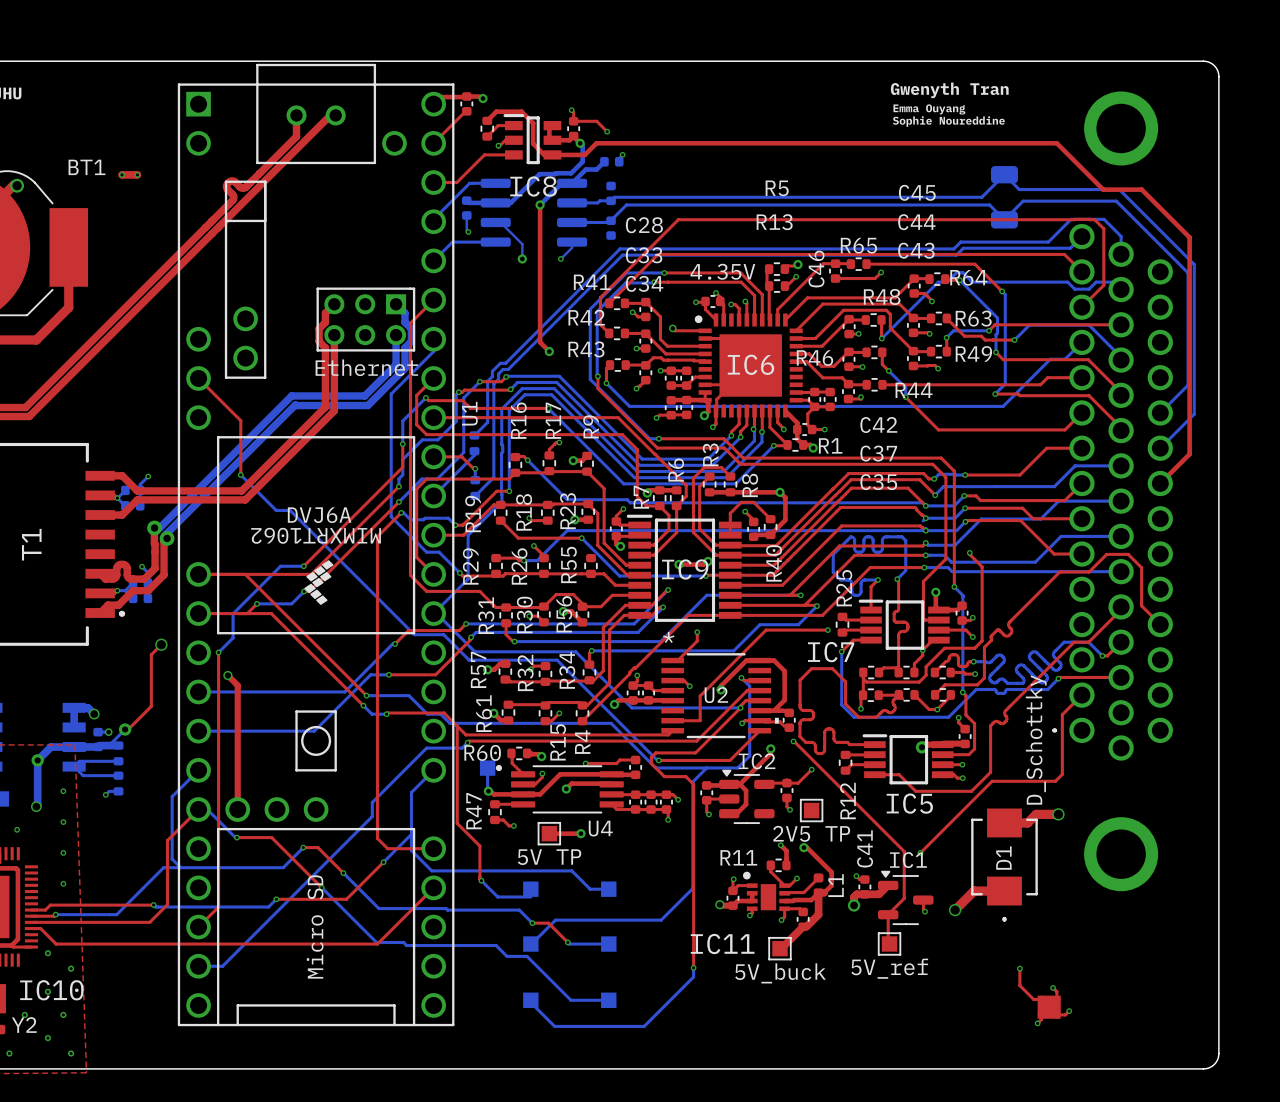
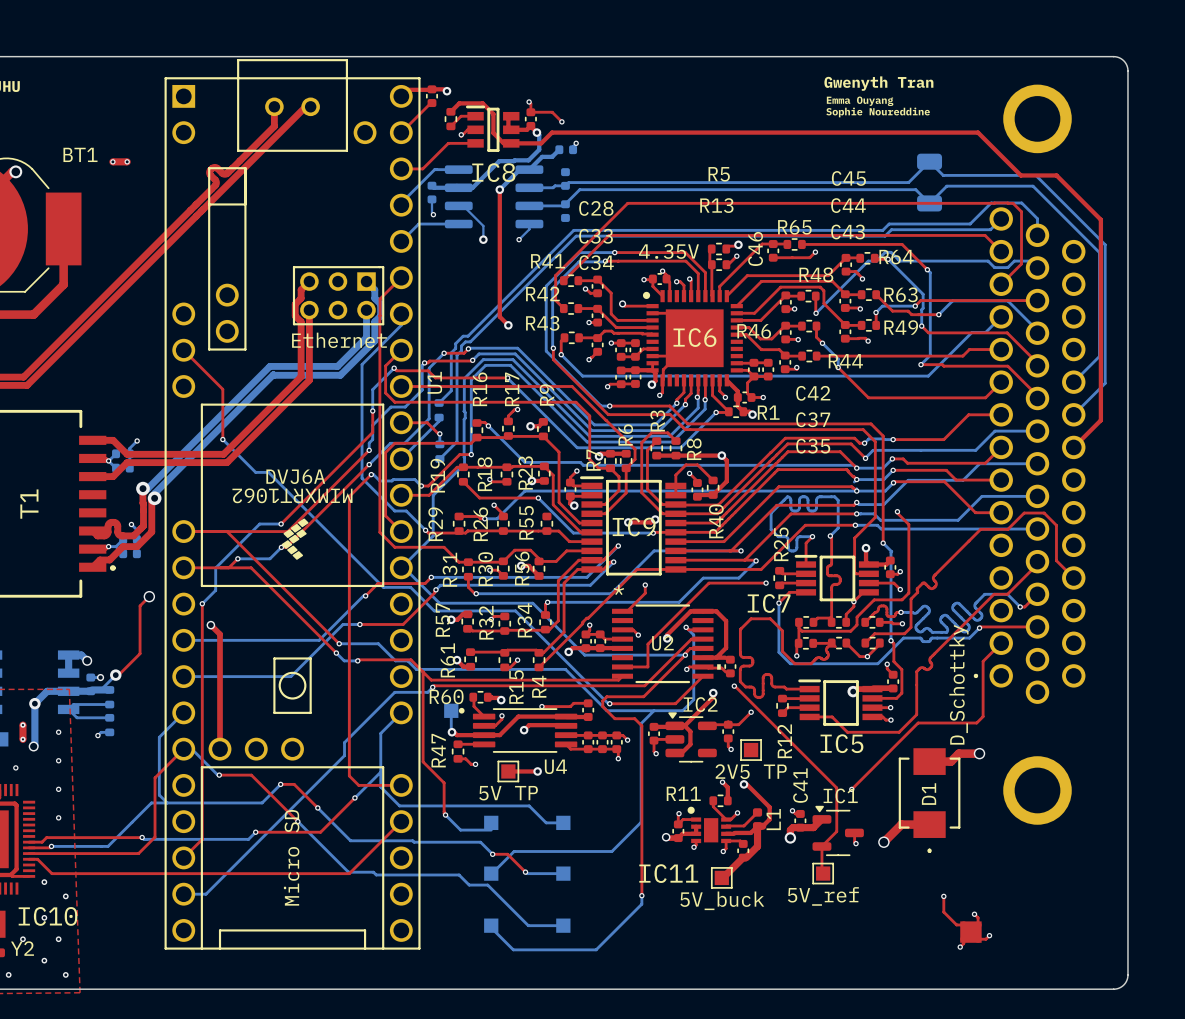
via: none -> (22, 725)
part: none -> (22, 732)
via: none -> (22, 739)

